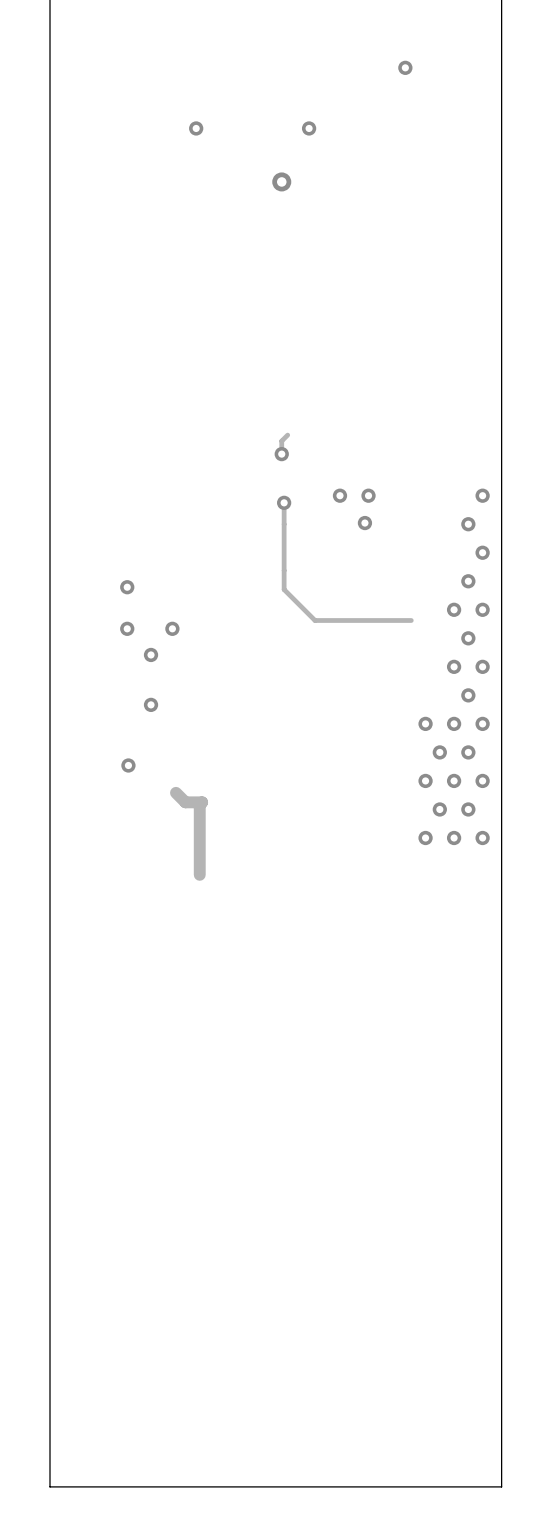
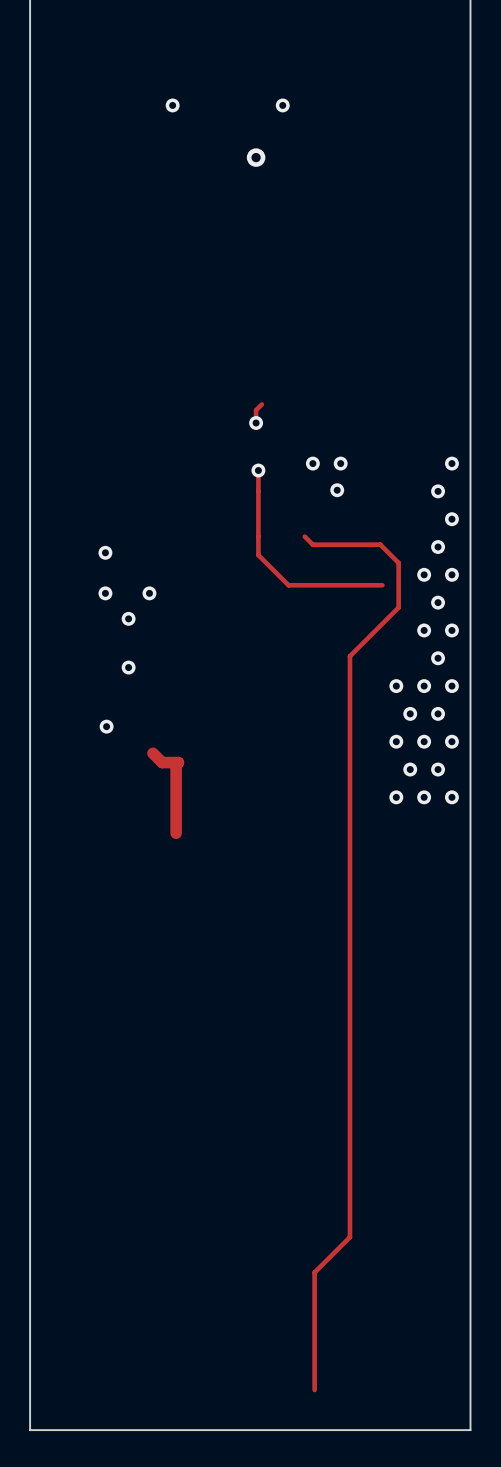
via: (405, 67) -> none
track: none -> (304, 536) (312, 544) (380, 544) (398, 562) (398, 607) (349, 656) (349, 1237) (314, 1272) (314, 1389)

